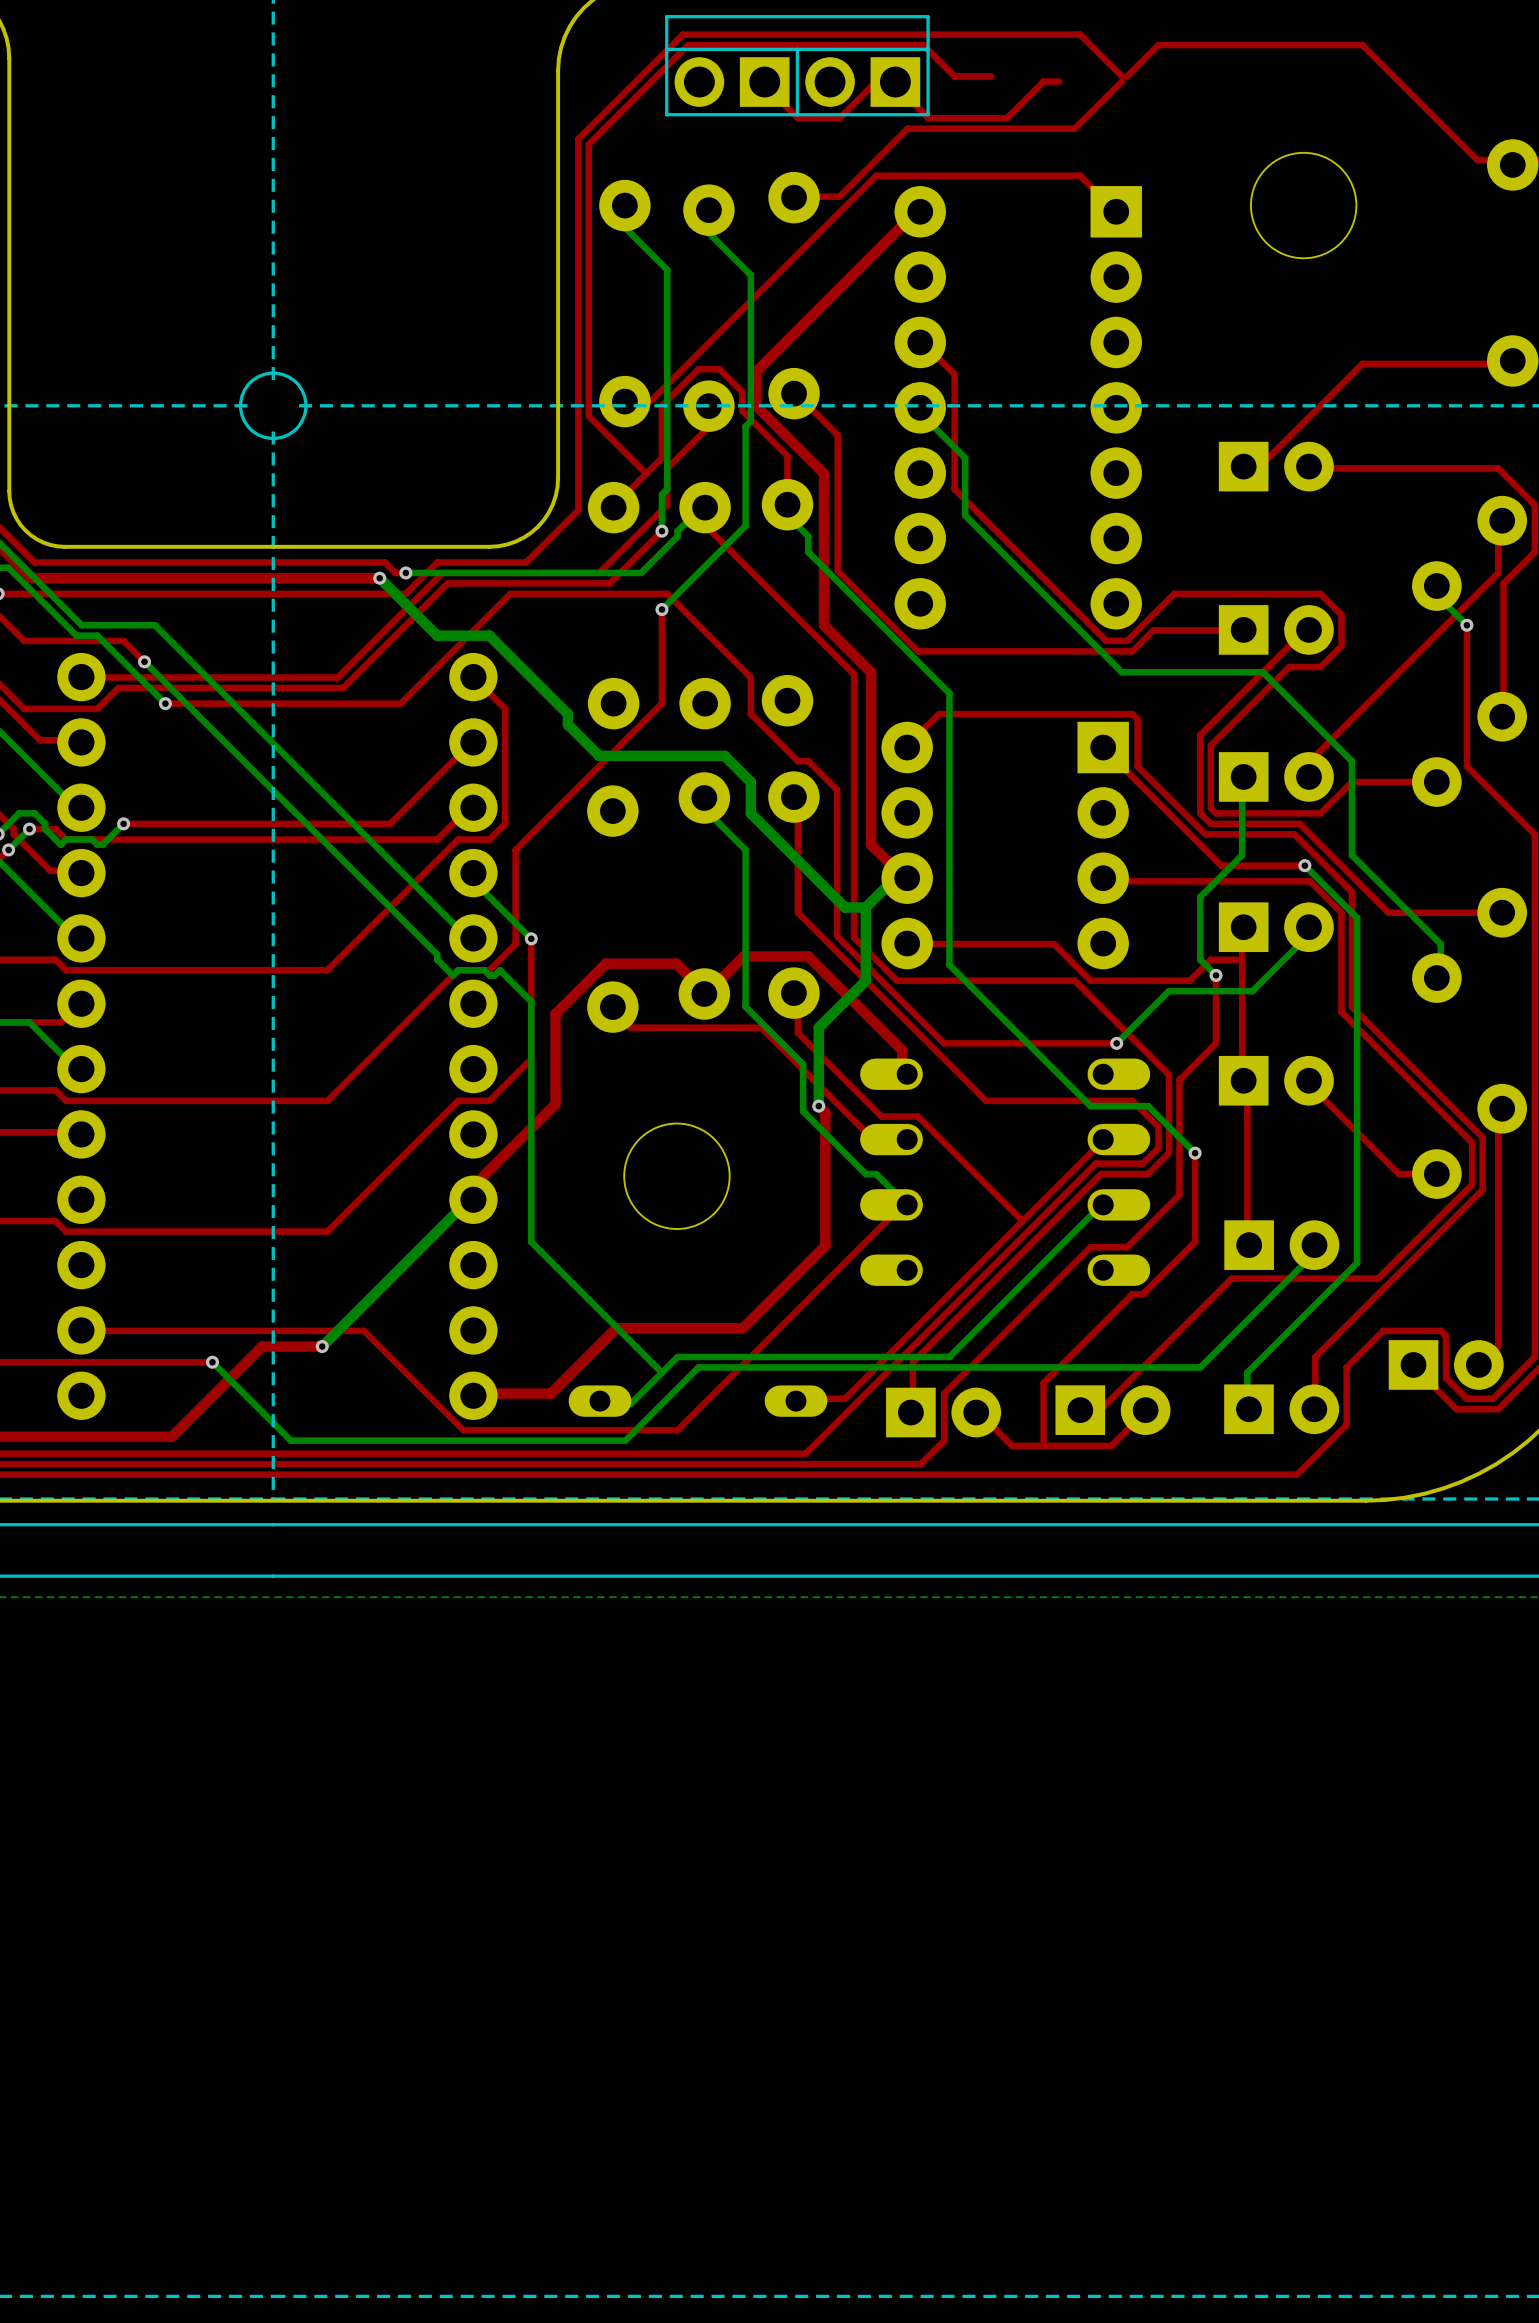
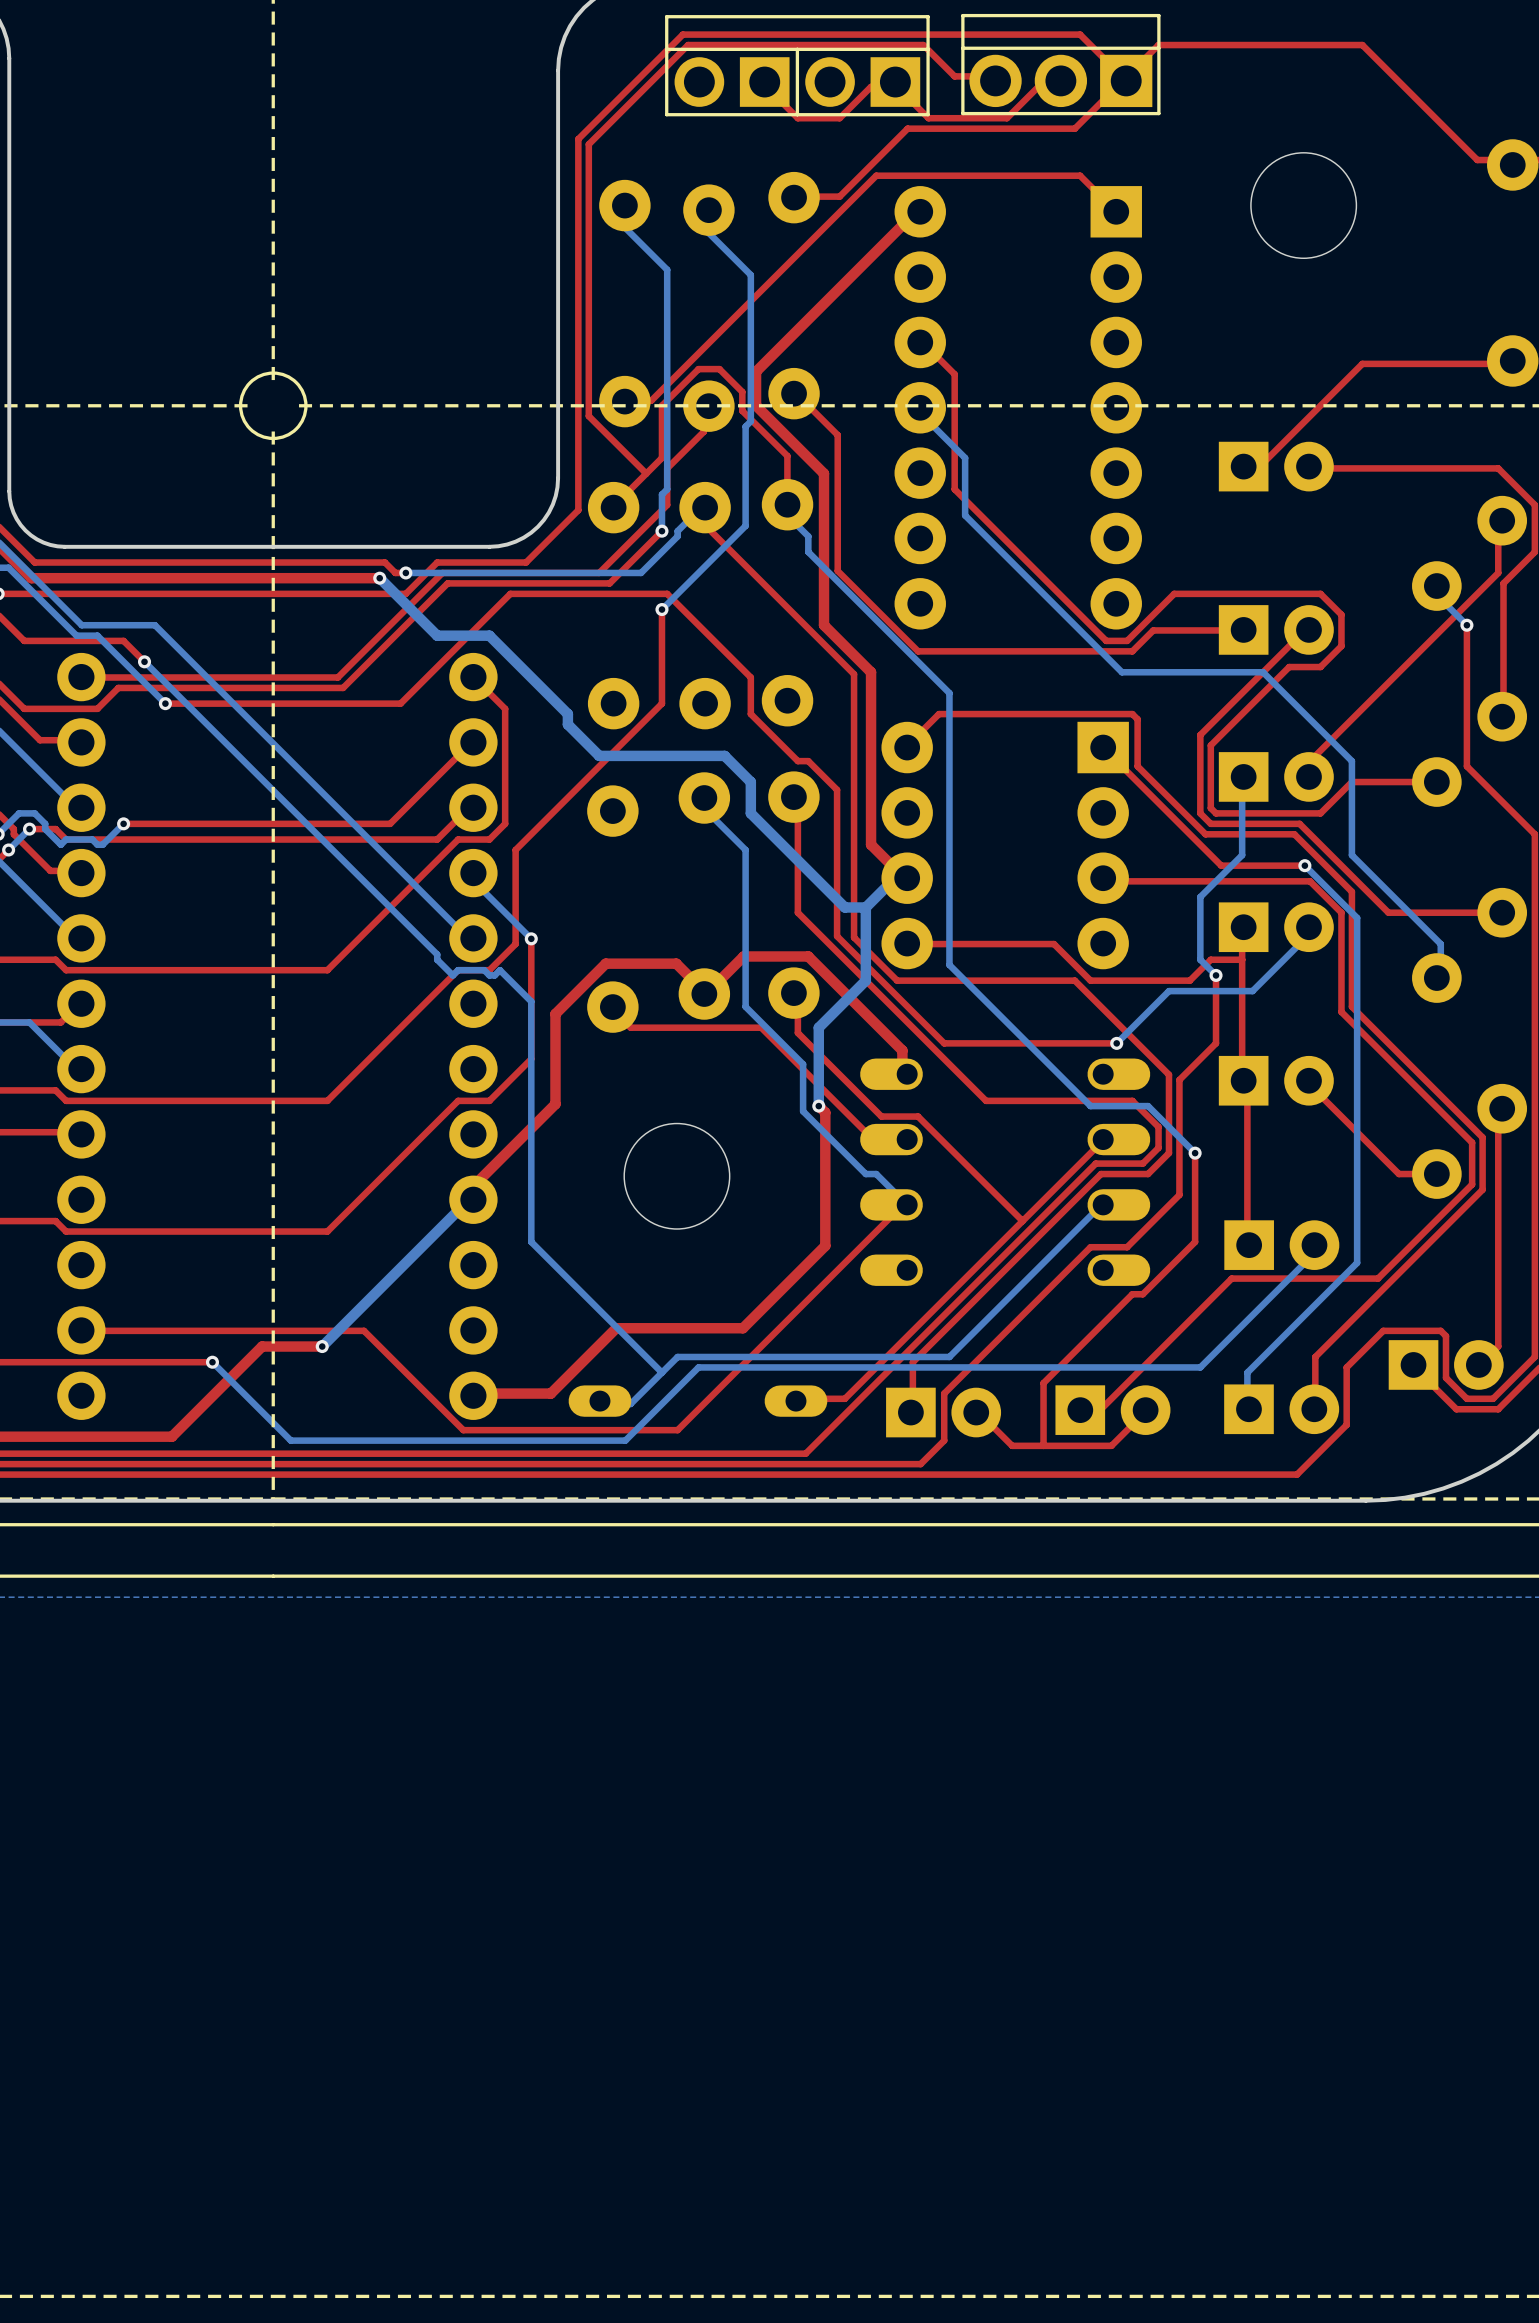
part: none -> (1060, 64)

